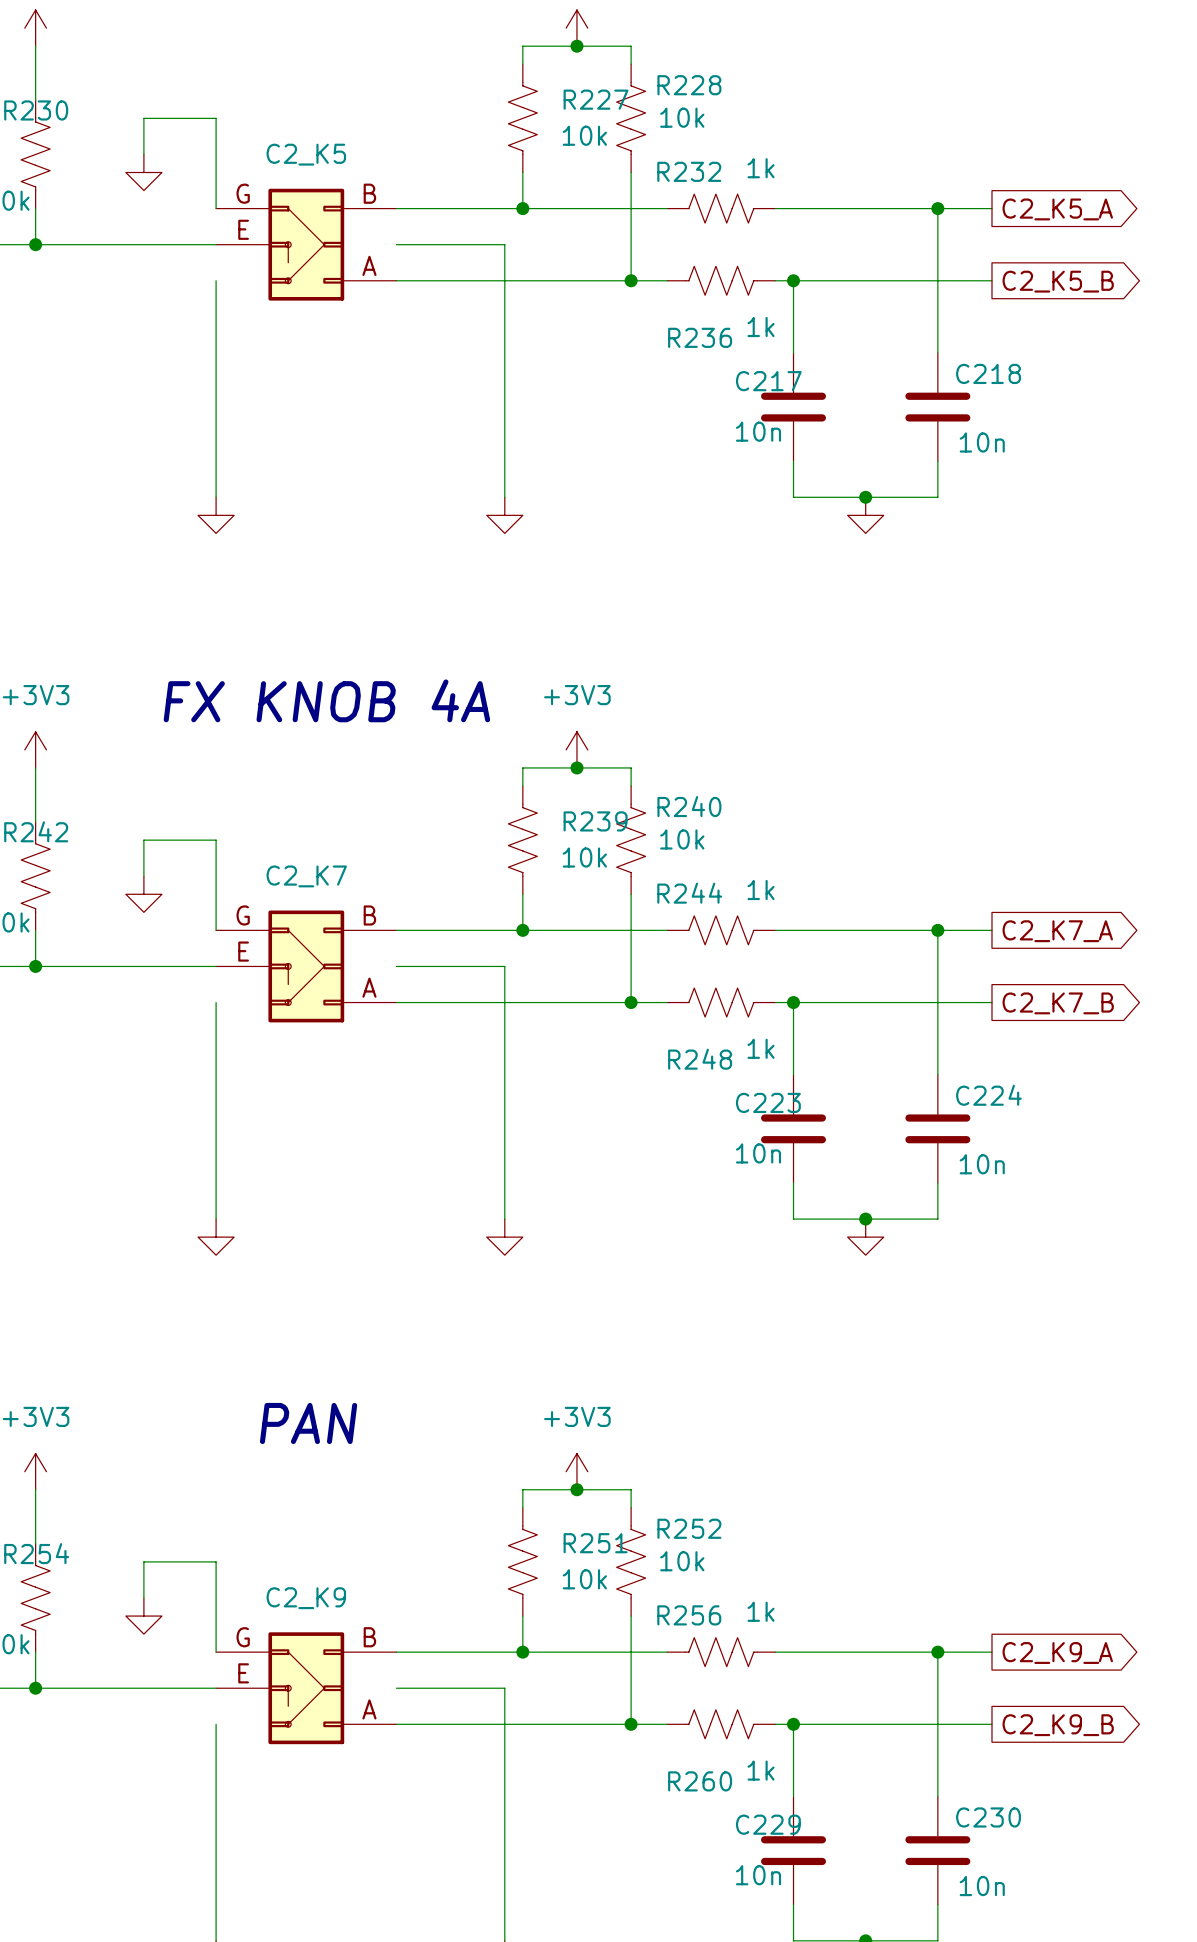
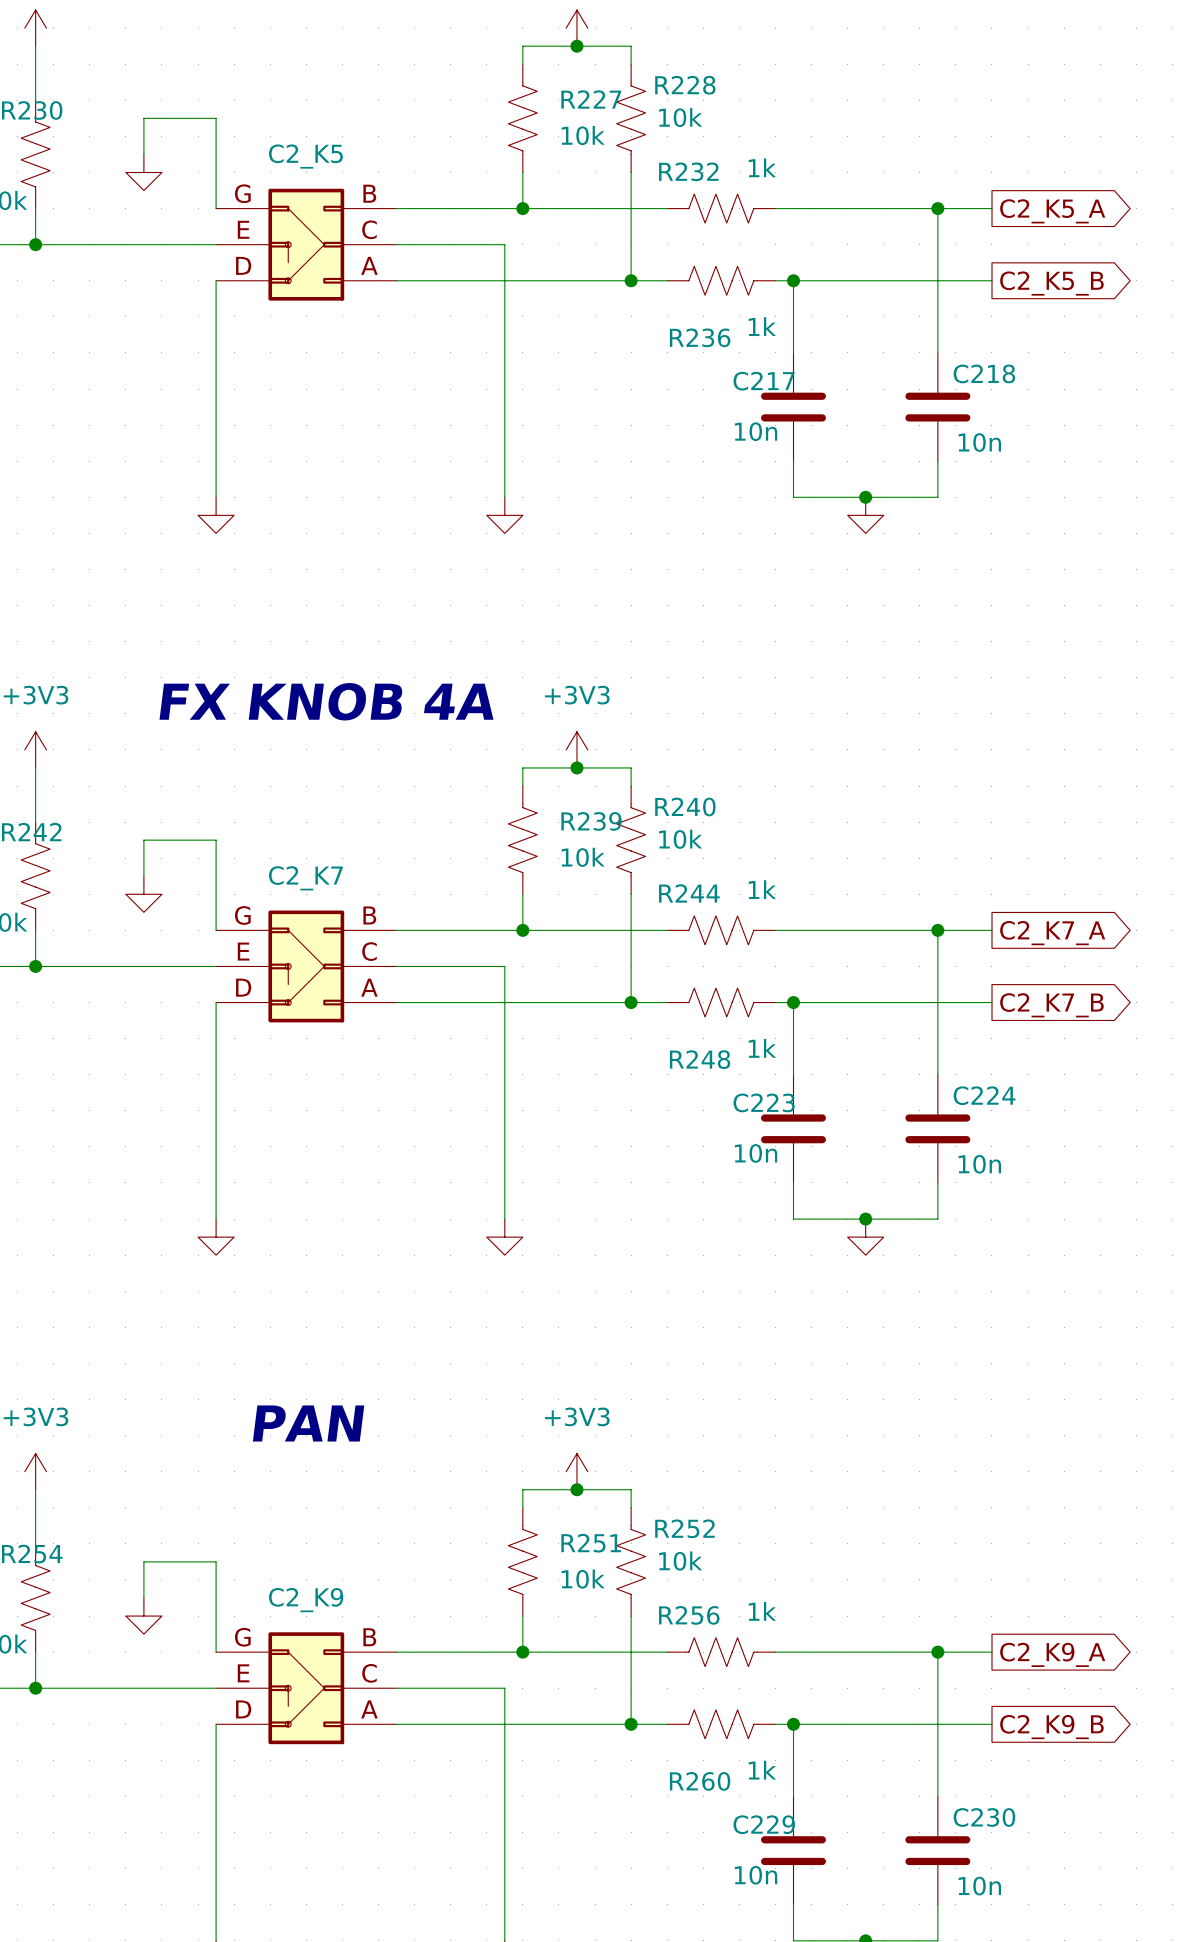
part symbol: [216, 188, 397, 301] -> [216, 188, 397, 301]
part symbol: [216, 910, 397, 1023] -> [216, 910, 397, 1023]
part symbol: [216, 1632, 397, 1745] -> [216, 1632, 397, 1745]

